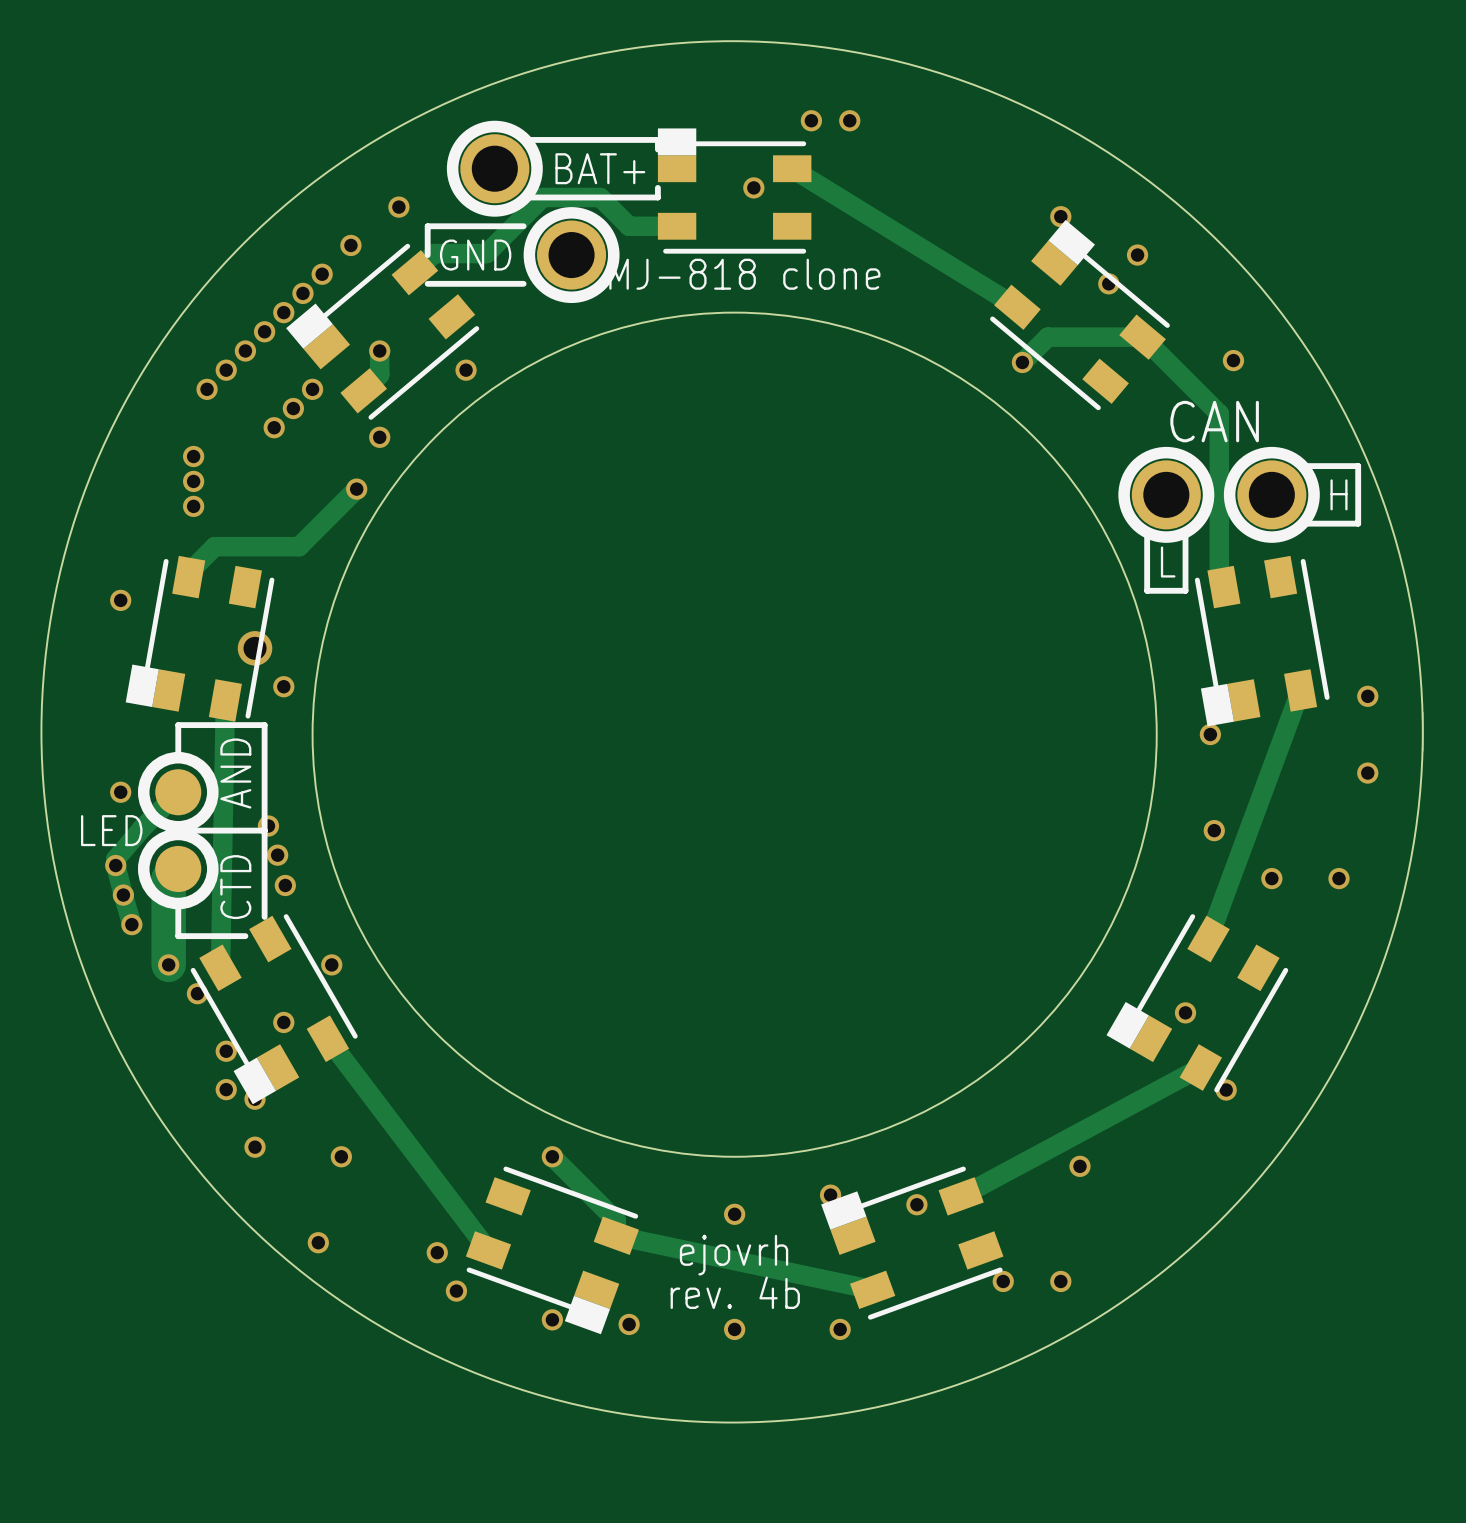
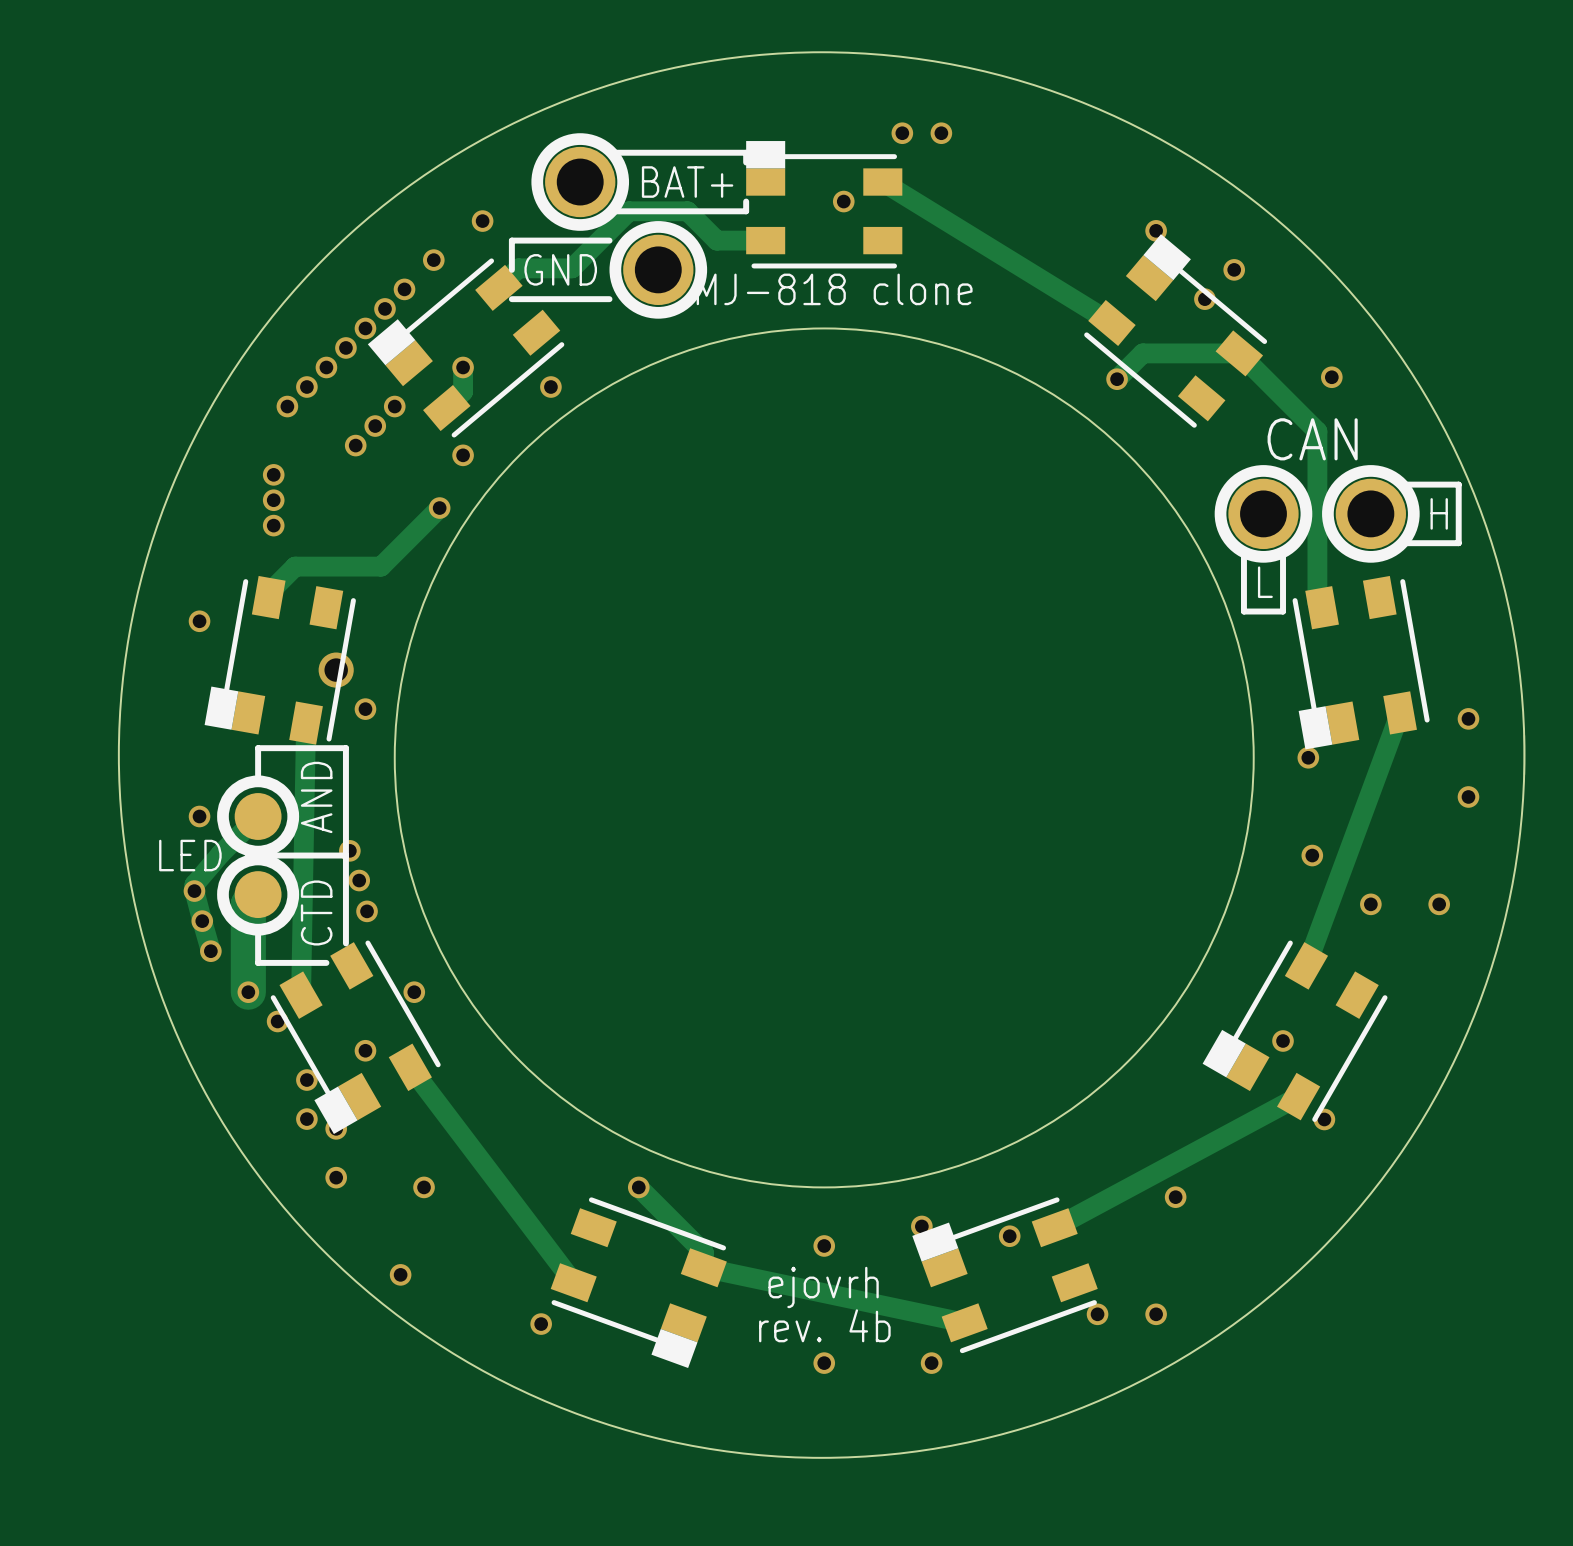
via: (437, 1252) -> none
via: (552, 1319) -> none
via: (629, 1324) -> none

